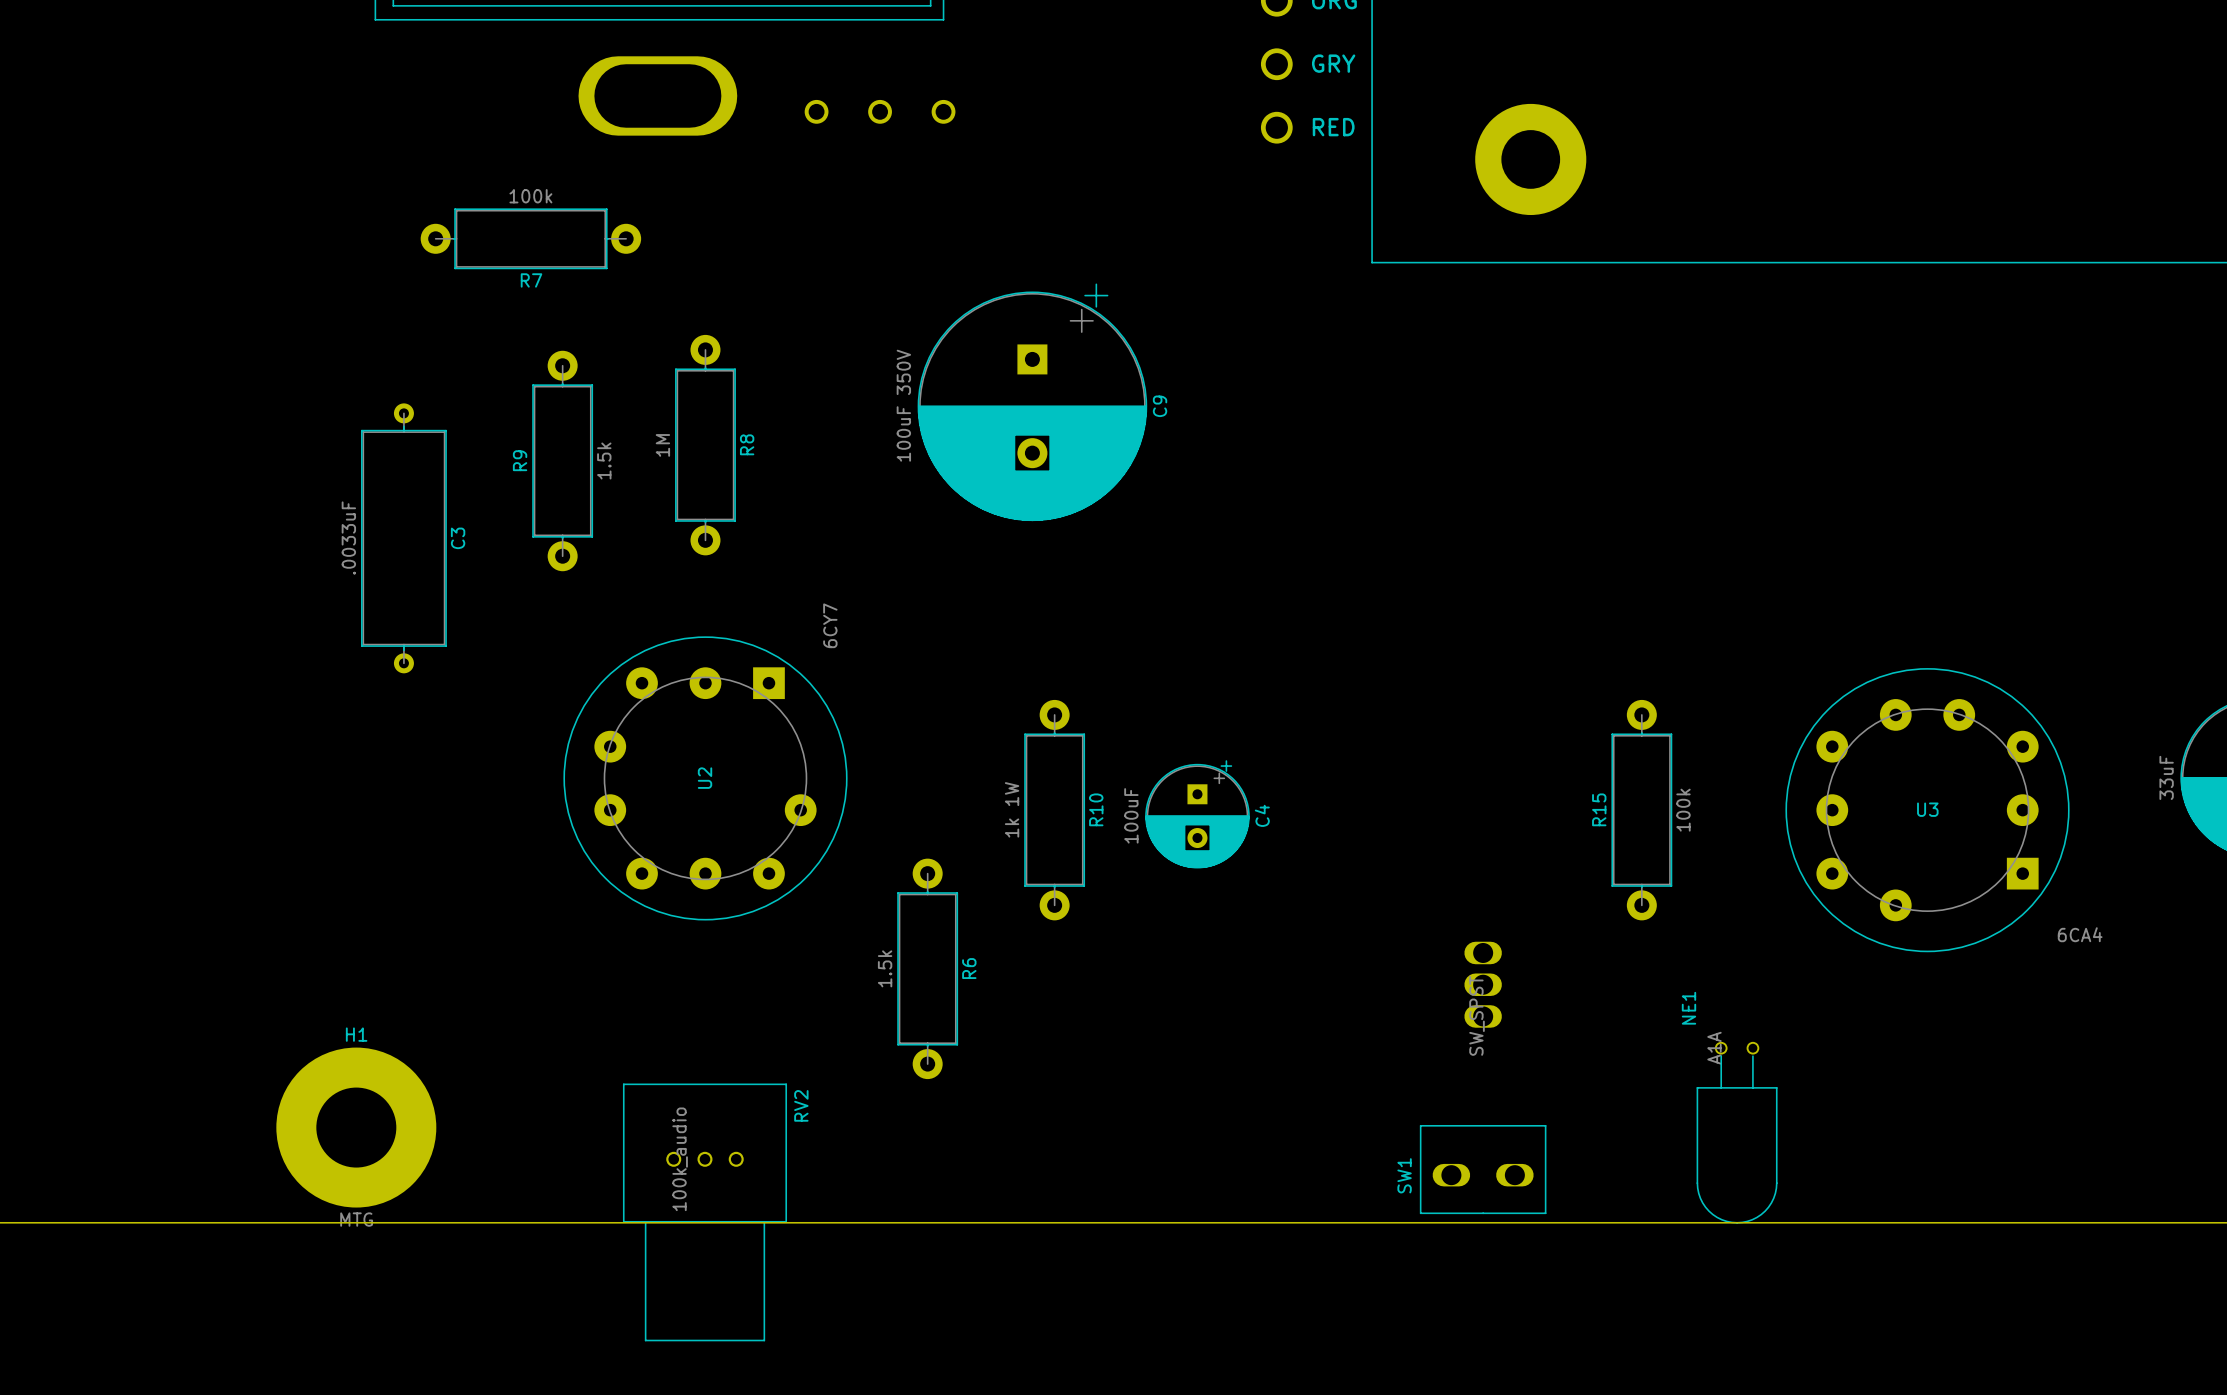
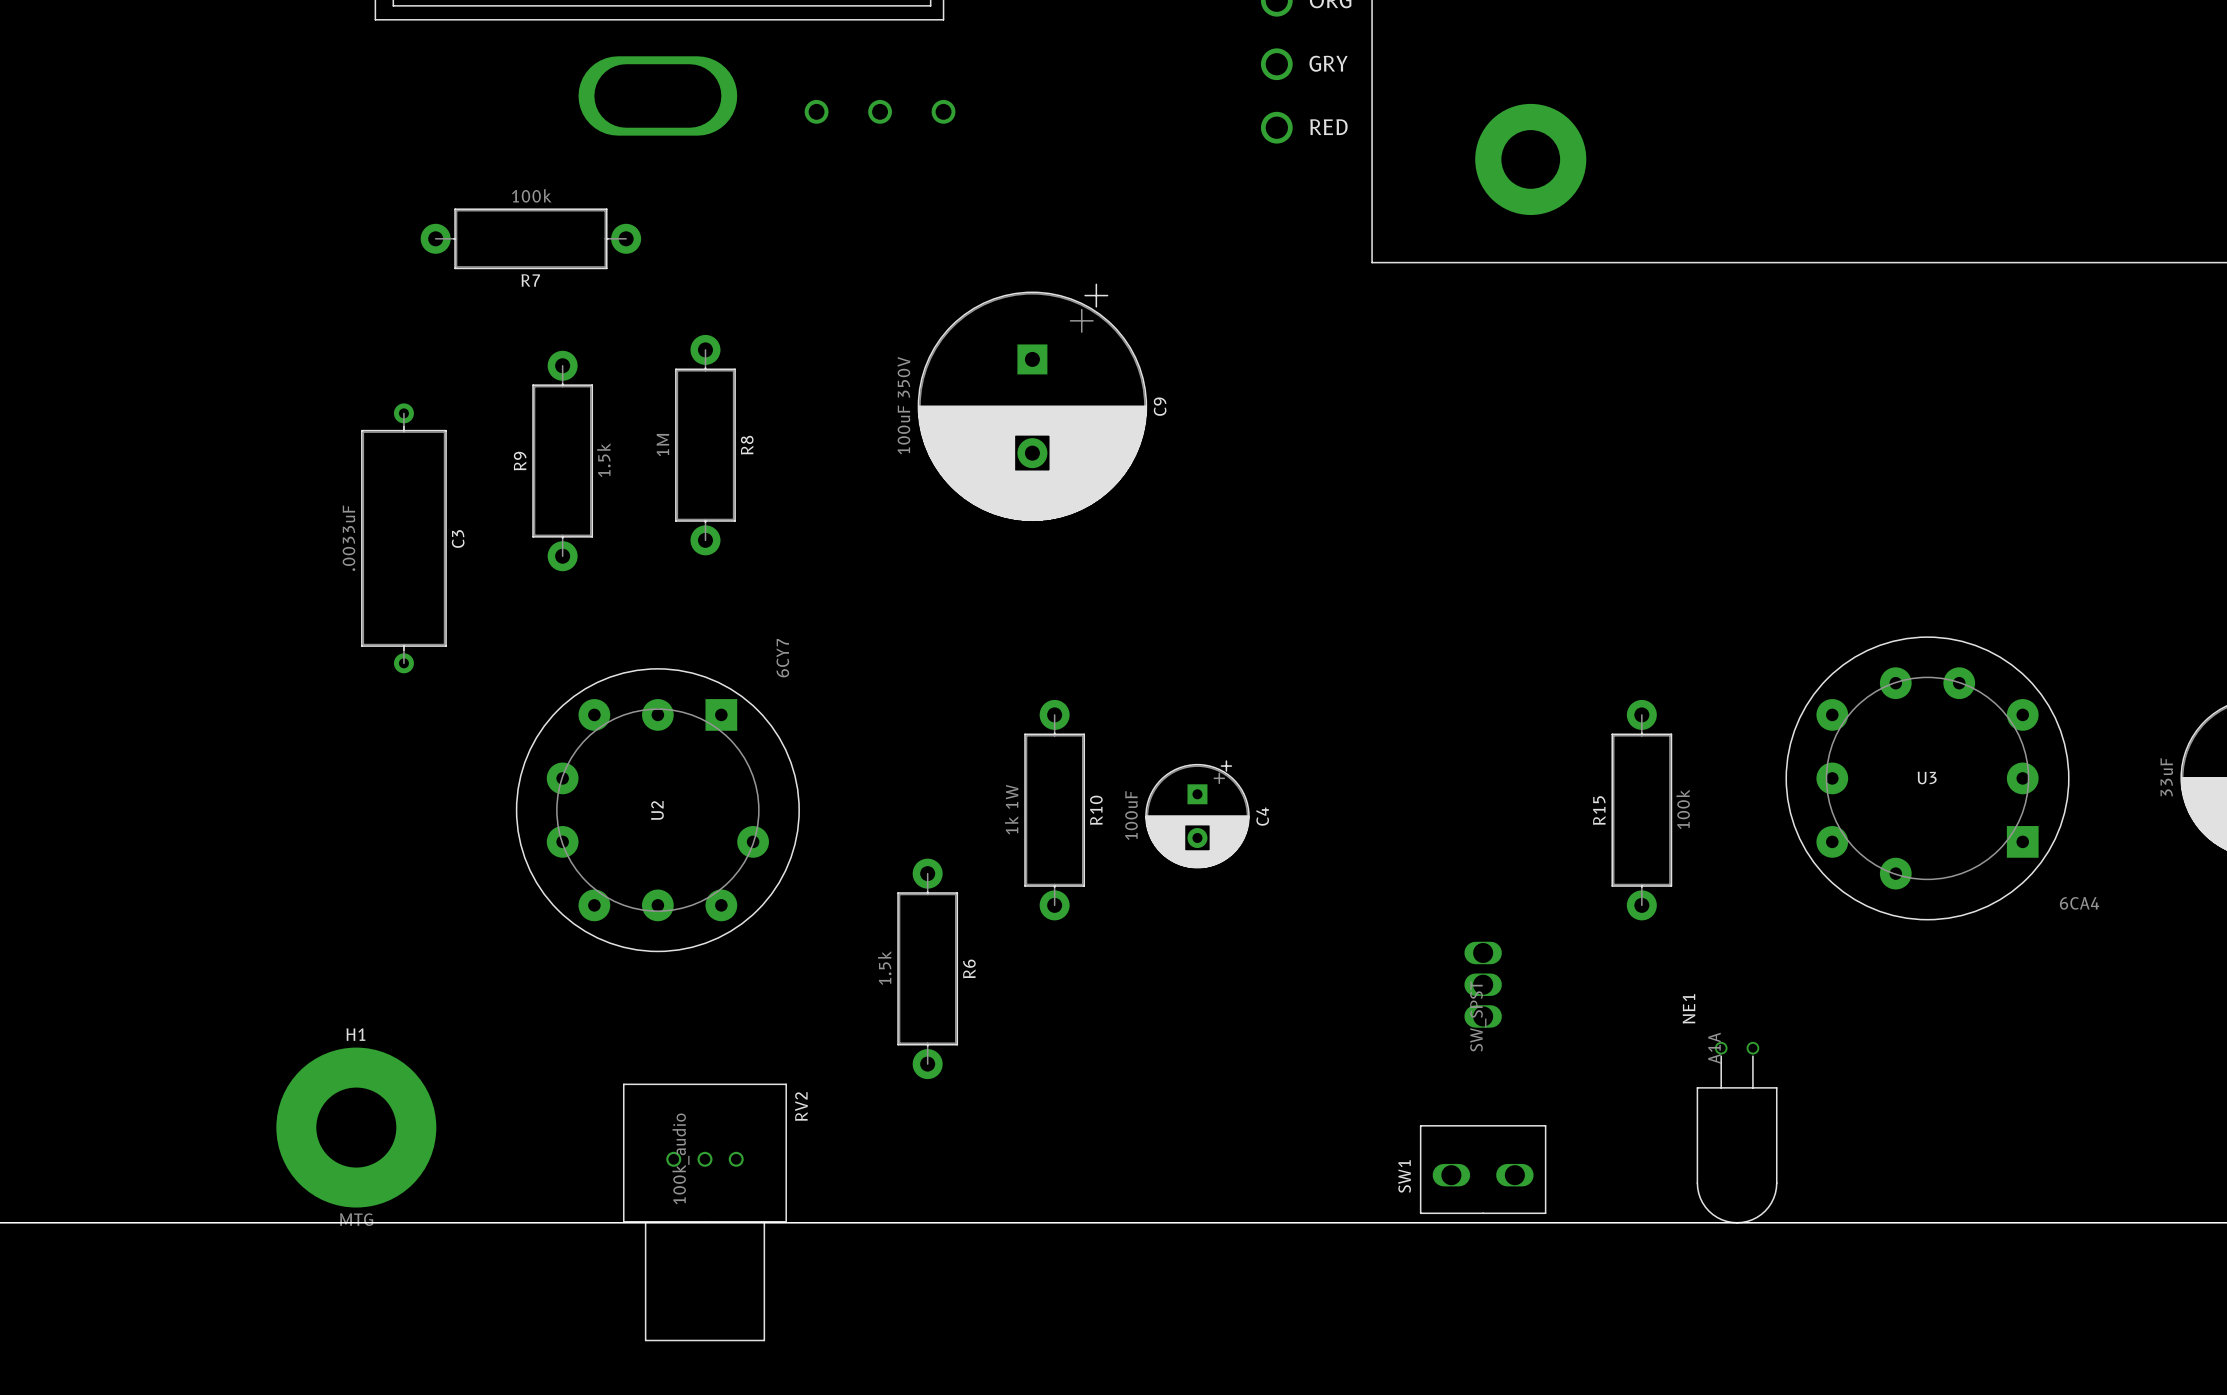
U2 position: (705, 778) -> (657, 810)
U3 position: (1927, 810) -> (1927, 778)

